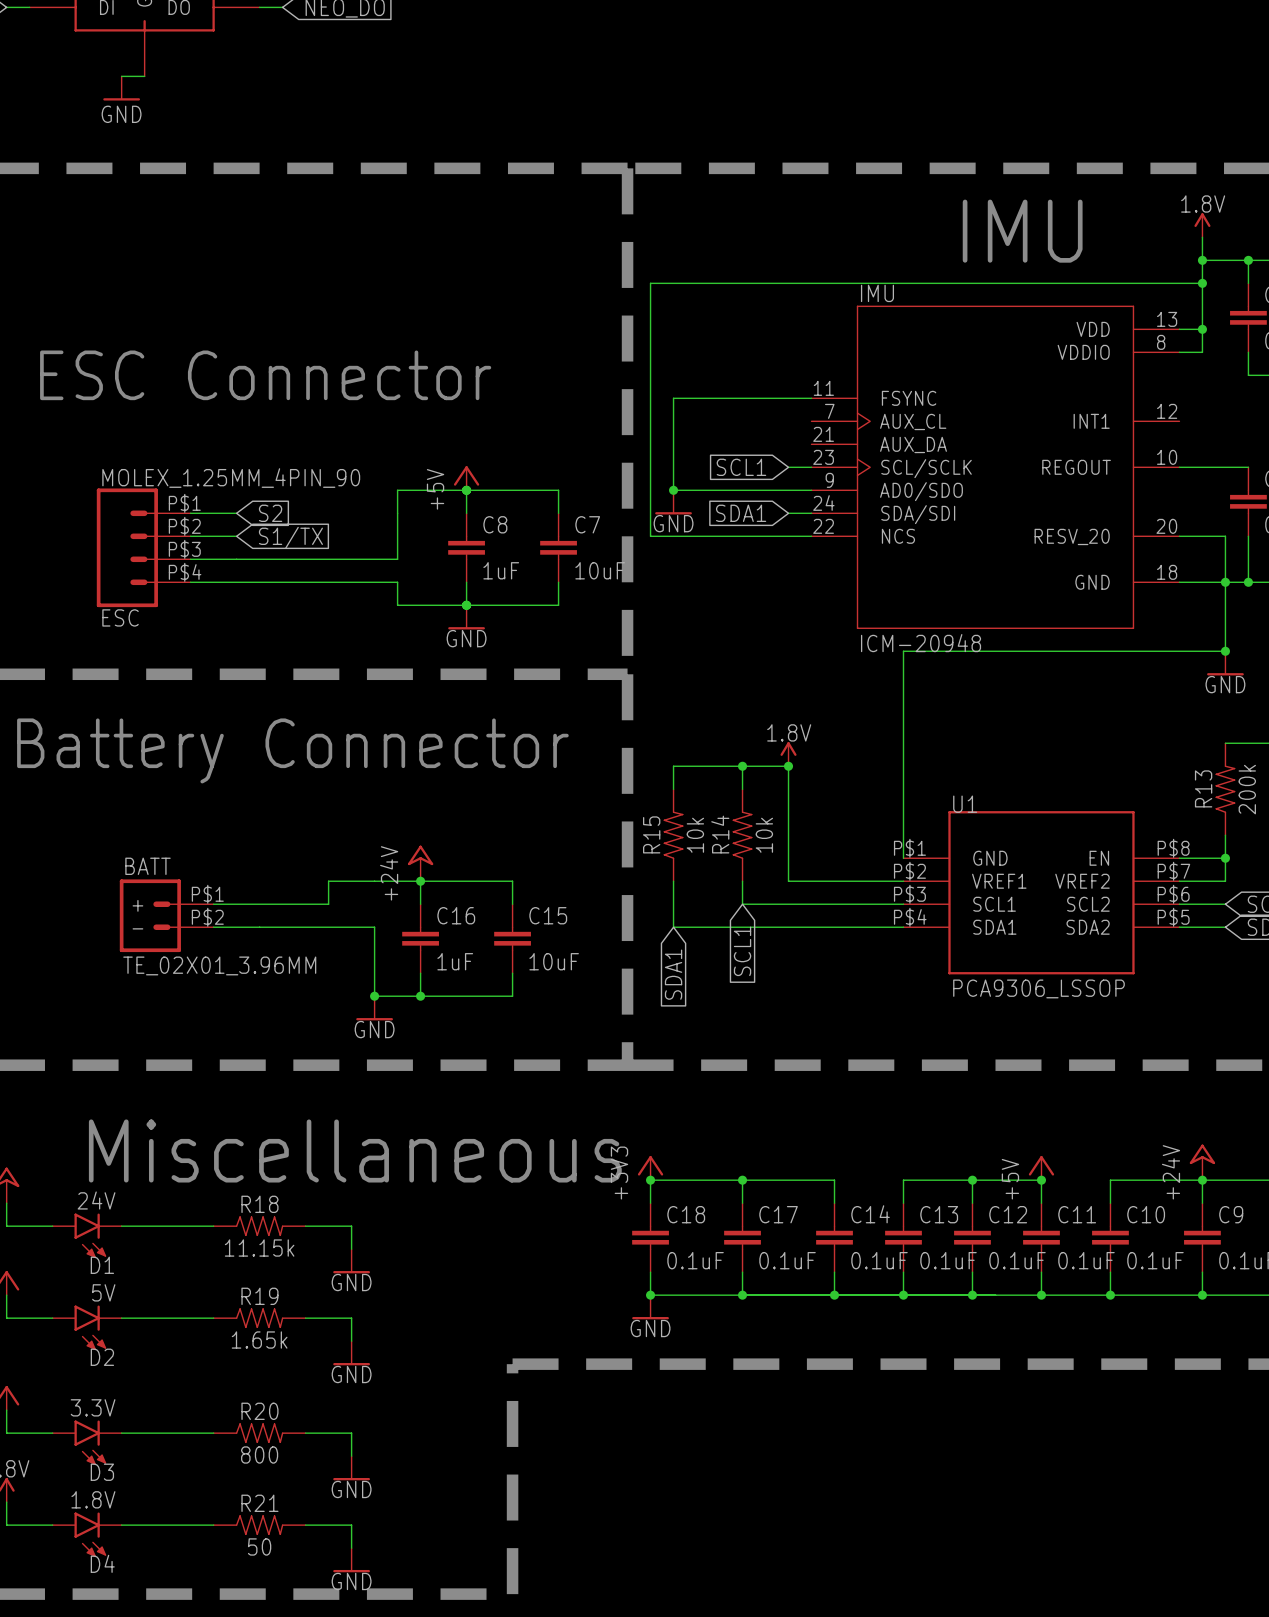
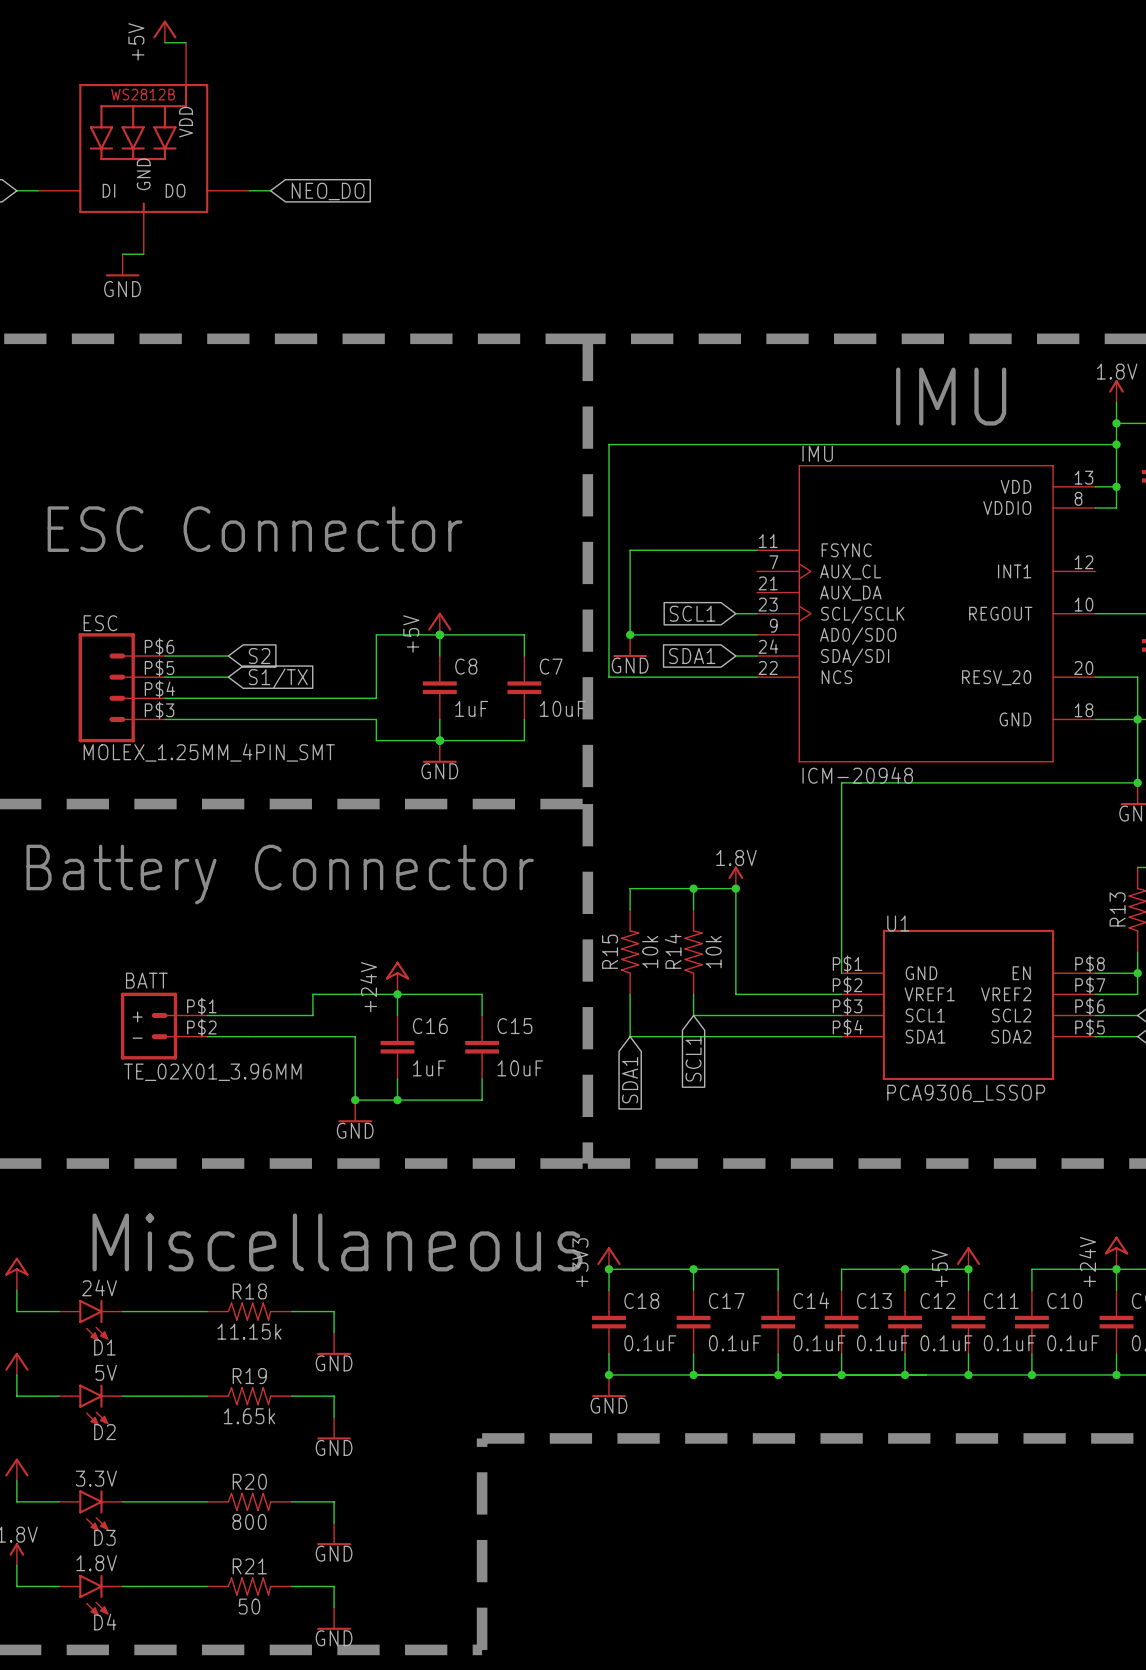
ESC: none -> MOLEX_1.25MM_4PIN_SMT (121, 687)
ESC: MOLEX_1.25MM_4PIN_90 (143, 547) -> none

